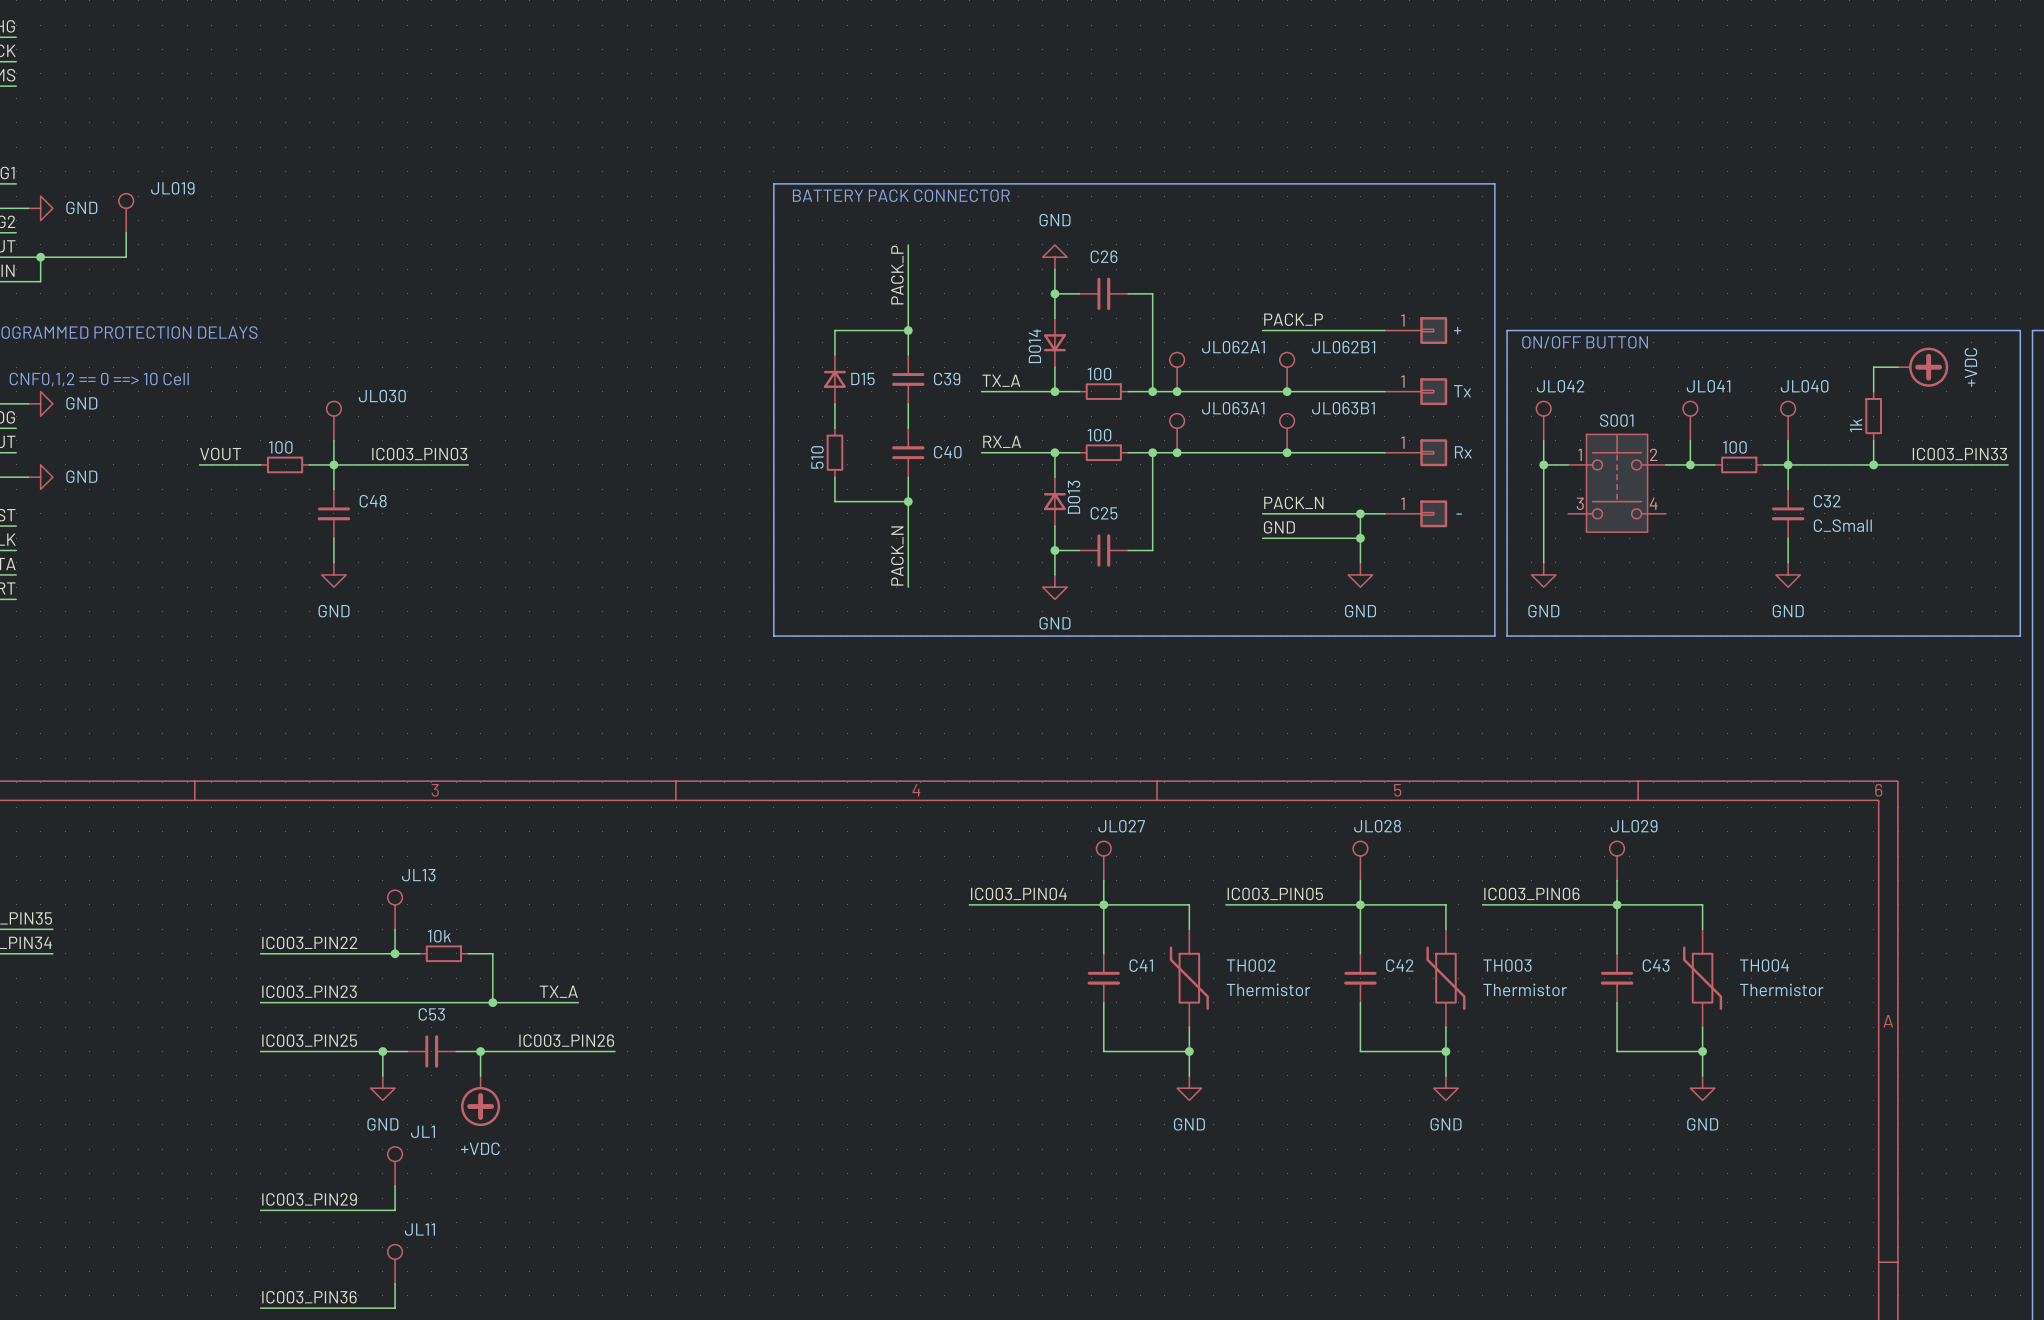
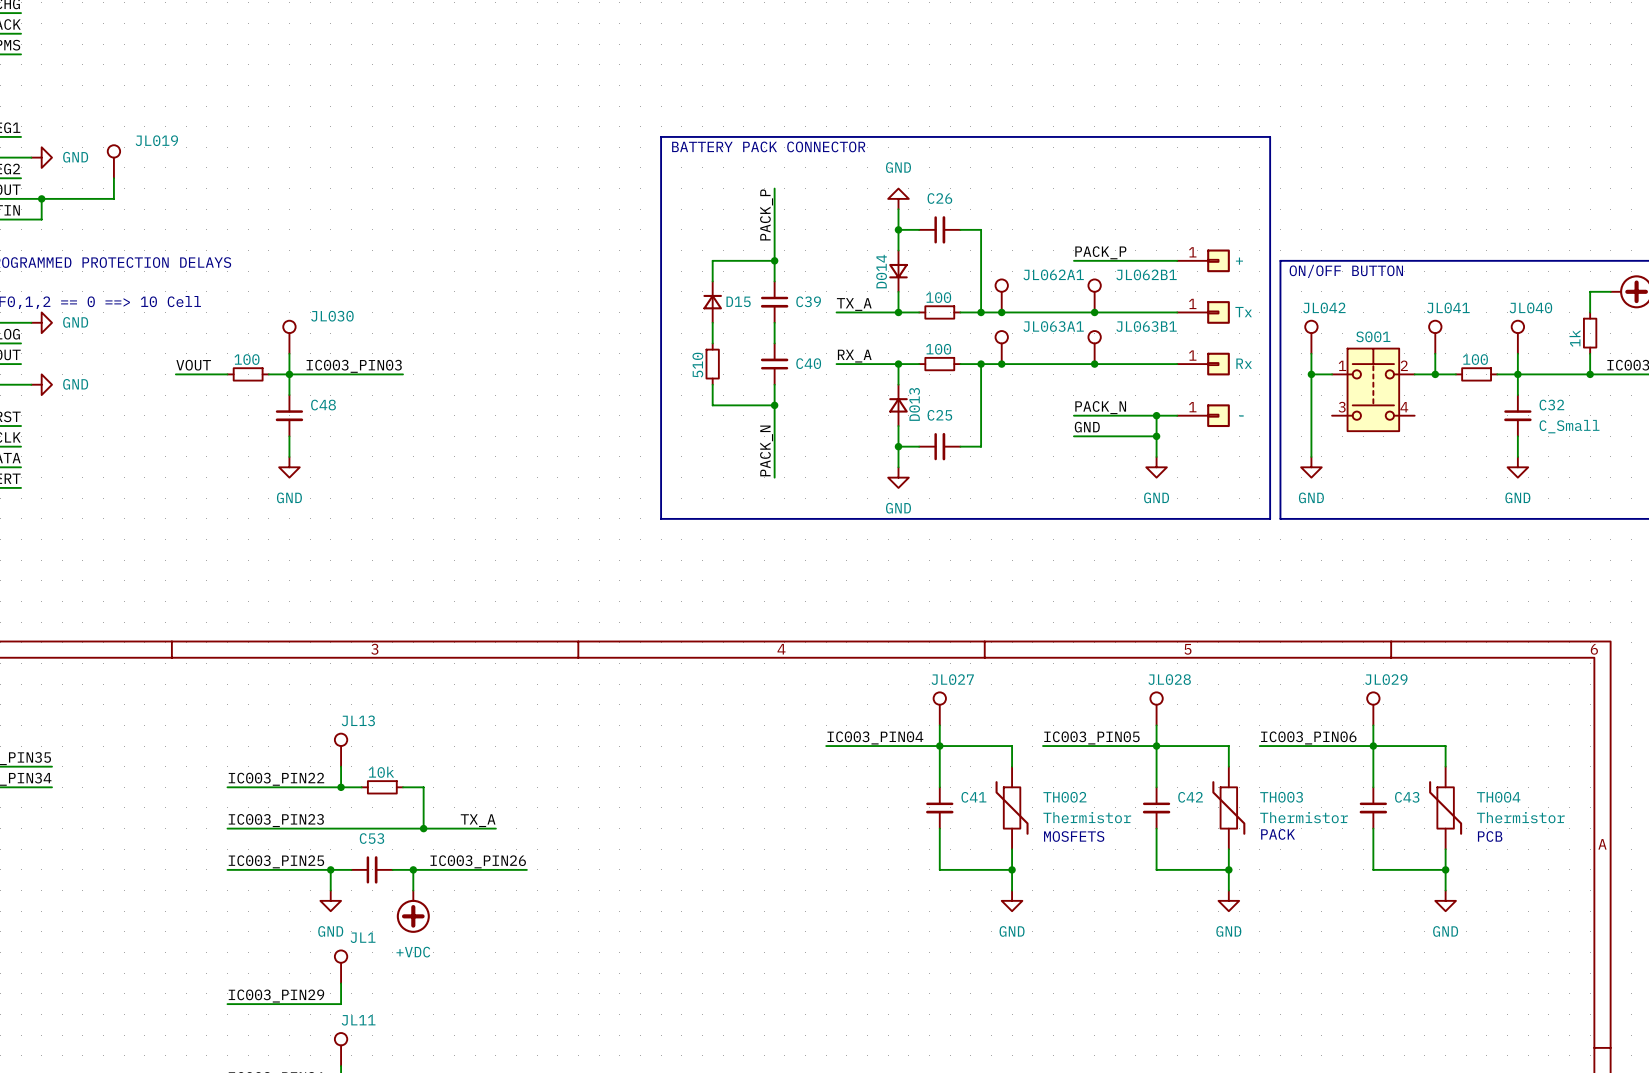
text: none -> PACK (1278, 834)
text: none -> MOSFETS (1074, 836)
text: none -> PCB (1490, 836)

